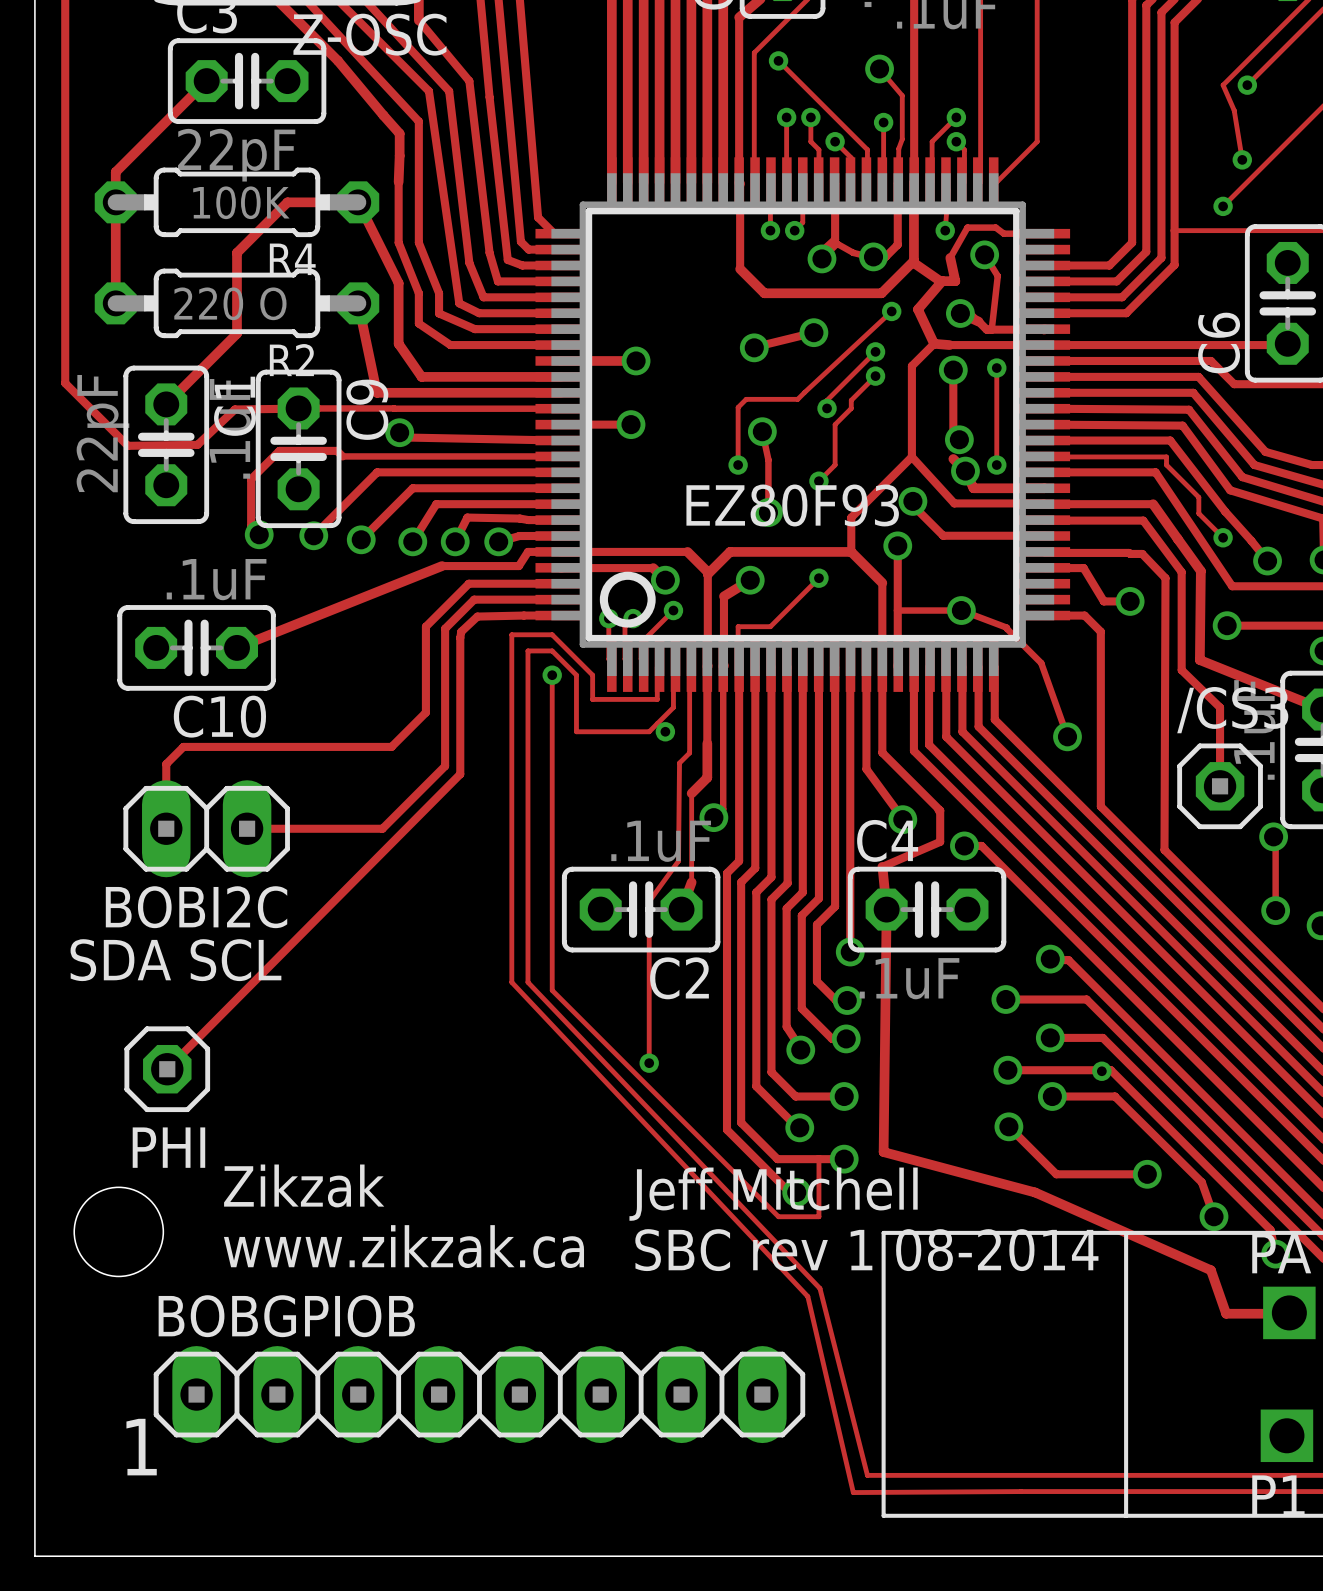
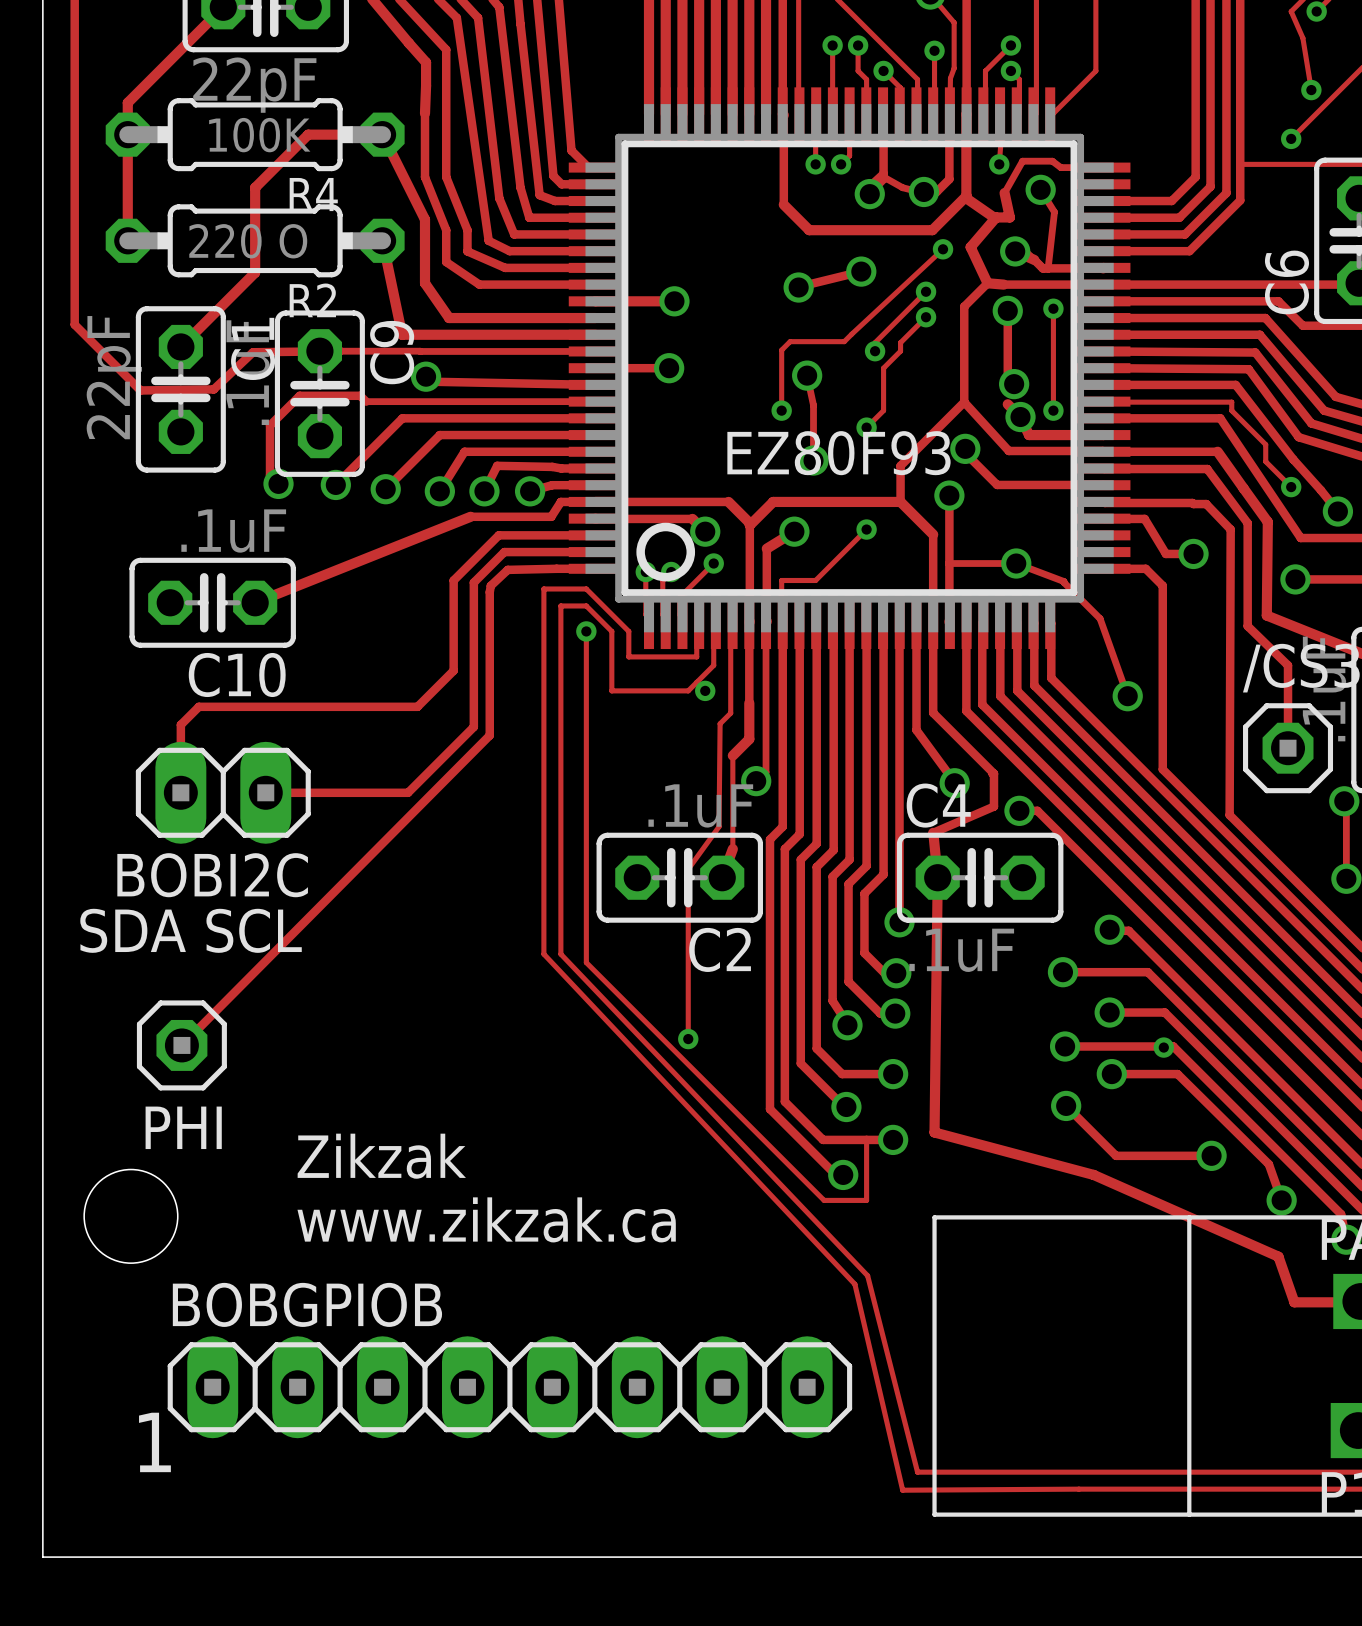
text position: Zikzak (304, 1185) -> Zikzak (381, 1156)
text: Jeff Mitchell (773, 1194) -> none
text position: www.zikzak.ca (403, 1246) -> www.zikzak.ca (486, 1219)
text: SBC rev 1 08-2014 (866, 1250) -> none

